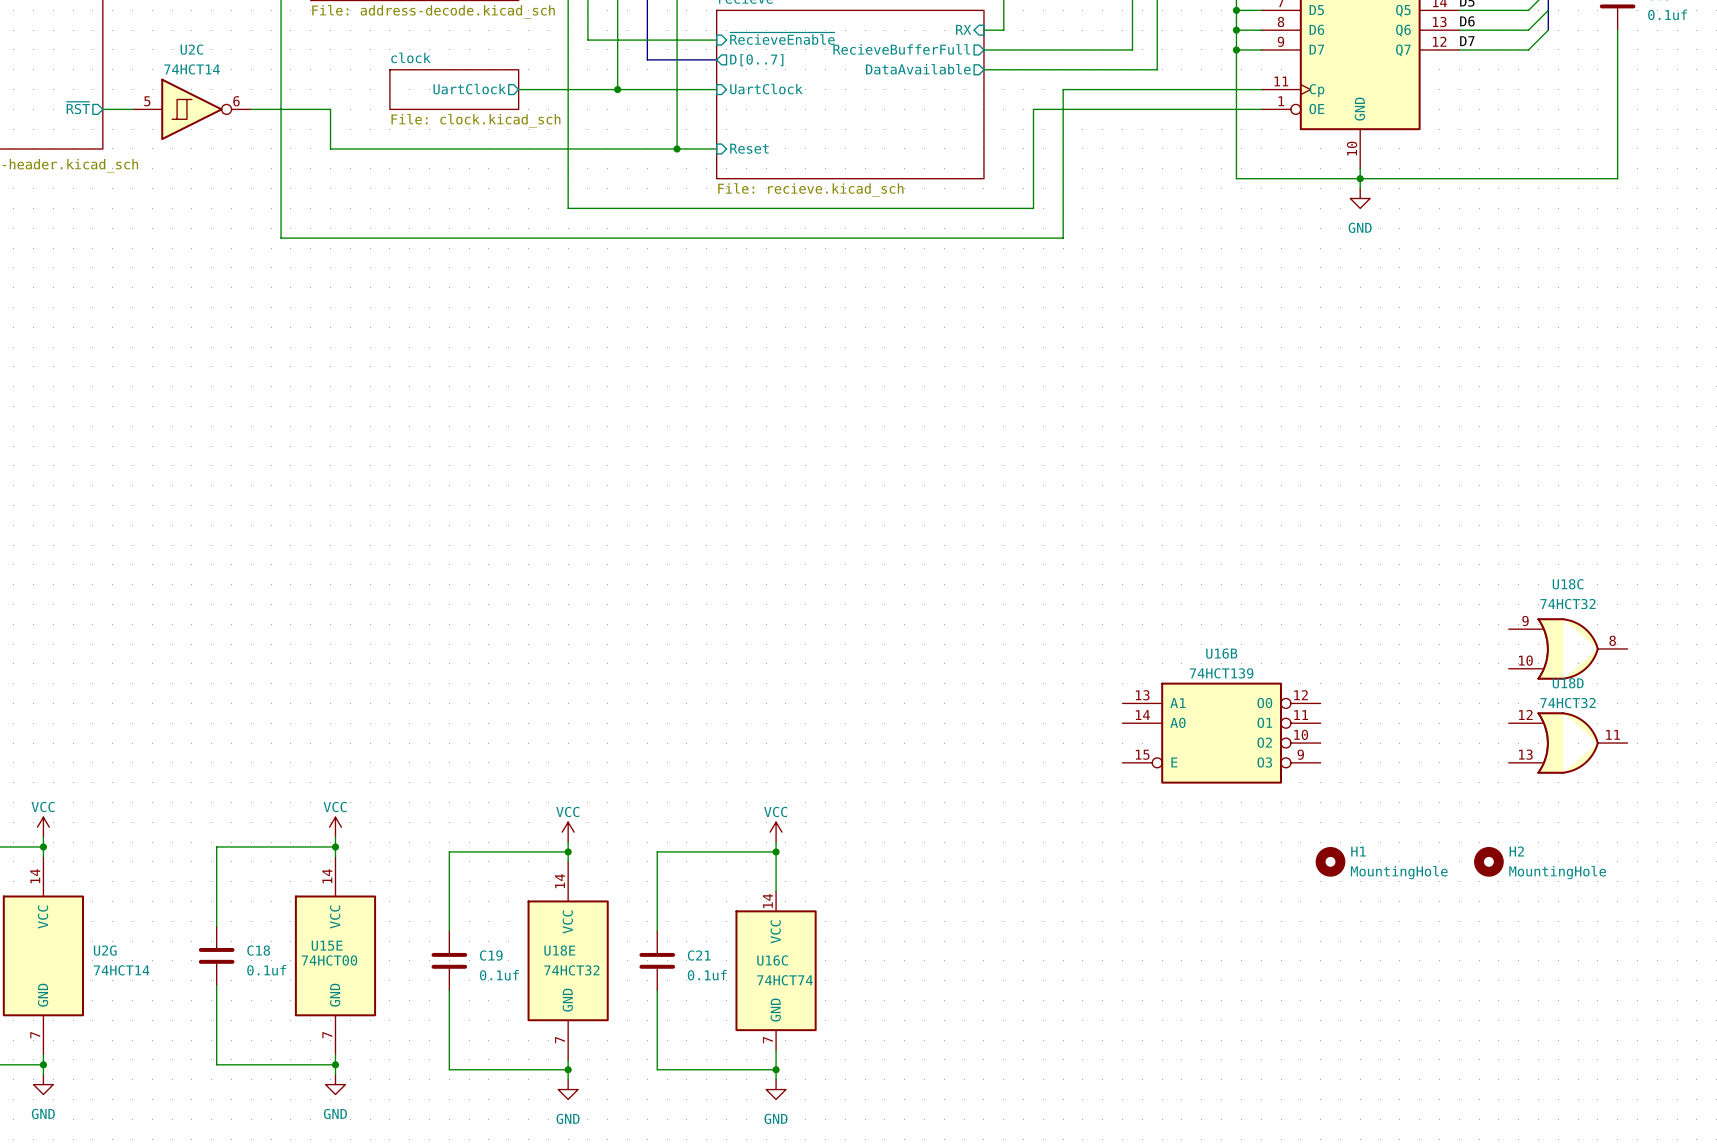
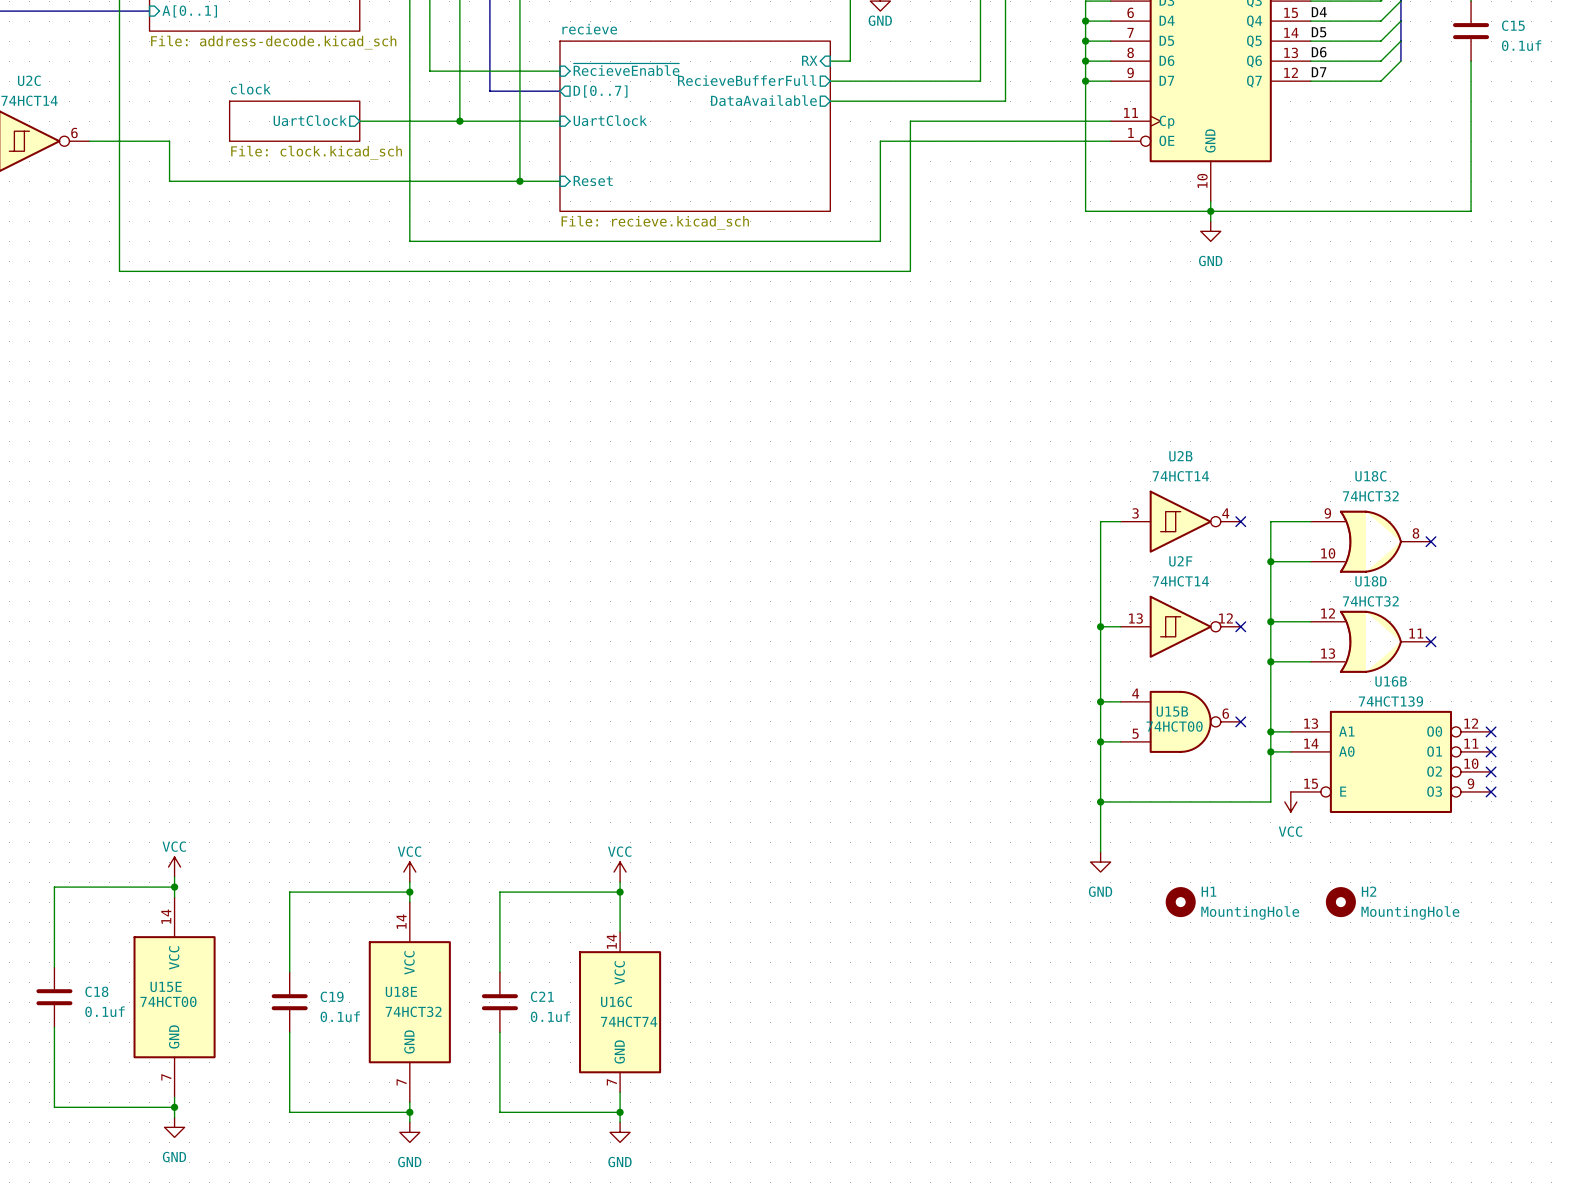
wire: none -> (1120, 521) (1100, 521) (1100, 852)
U2B: none -> 74HCT14 (1180, 521)
no-connect mark: none -> (1240, 521)
wire: none -> (1310, 521) (1270, 521) (1270, 801) (1100, 801)
no-connect mark: none -> (1430, 541)
wire: none -> (1270, 561) (1310, 561)
junction: none -> (1270, 561)
wire: none -> (1270, 621) (1310, 621)
junction: none -> (1270, 621)
wire: none -> (1100, 626) (1120, 626)
junction: none -> (1100, 626)
U2F: none -> 74HCT14 (1180, 626)
no-connect mark: none -> (1240, 626)
no-connect mark: none -> (1430, 641)
wire: none -> (1270, 661) (1310, 661)
junction: none -> (1270, 661)
U18C position: (1568, 648) -> (1370, 541)
wire: none -> (1100, 701) (1120, 701)
junction: none -> (1100, 701)
U15B: none -> 74HCT00 (1180, 721)
no-connect mark: none -> (1240, 721)
wire: none -> (1270, 731) (1290, 731)
junction: none -> (1270, 731)
no-connect mark: none -> (1491, 731)
junction: none -> (1100, 741)
wire: none -> (1270, 751) (1290, 751)
junction: none -> (1270, 751)
no-connect mark: none -> (1491, 751)
U16B position: (1221, 733) -> (1390, 761)
no-connect mark: none -> (1491, 771)
U18D position: (1568, 743) -> (1370, 641)
no-connect mark: none -> (1491, 791)
junction: none -> (1100, 801)
power symbol: none -> VCC (1290, 801)
power symbol: none -> GND (1100, 862)

